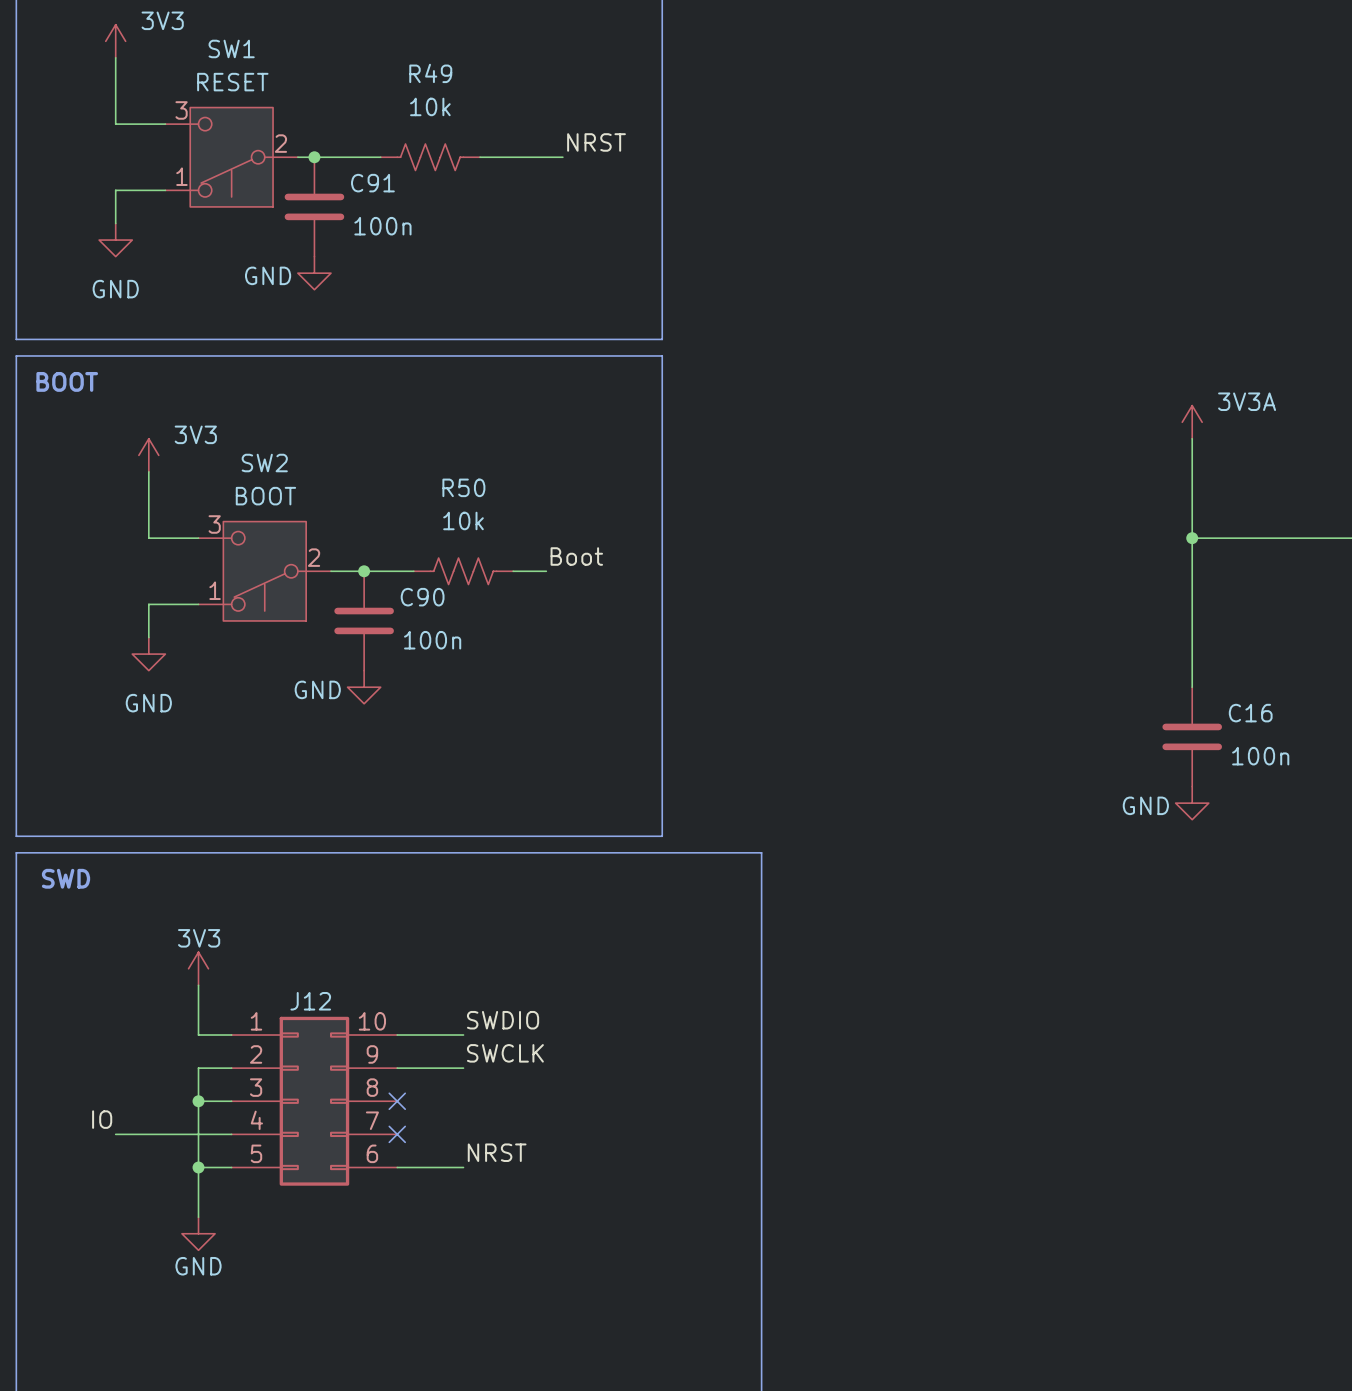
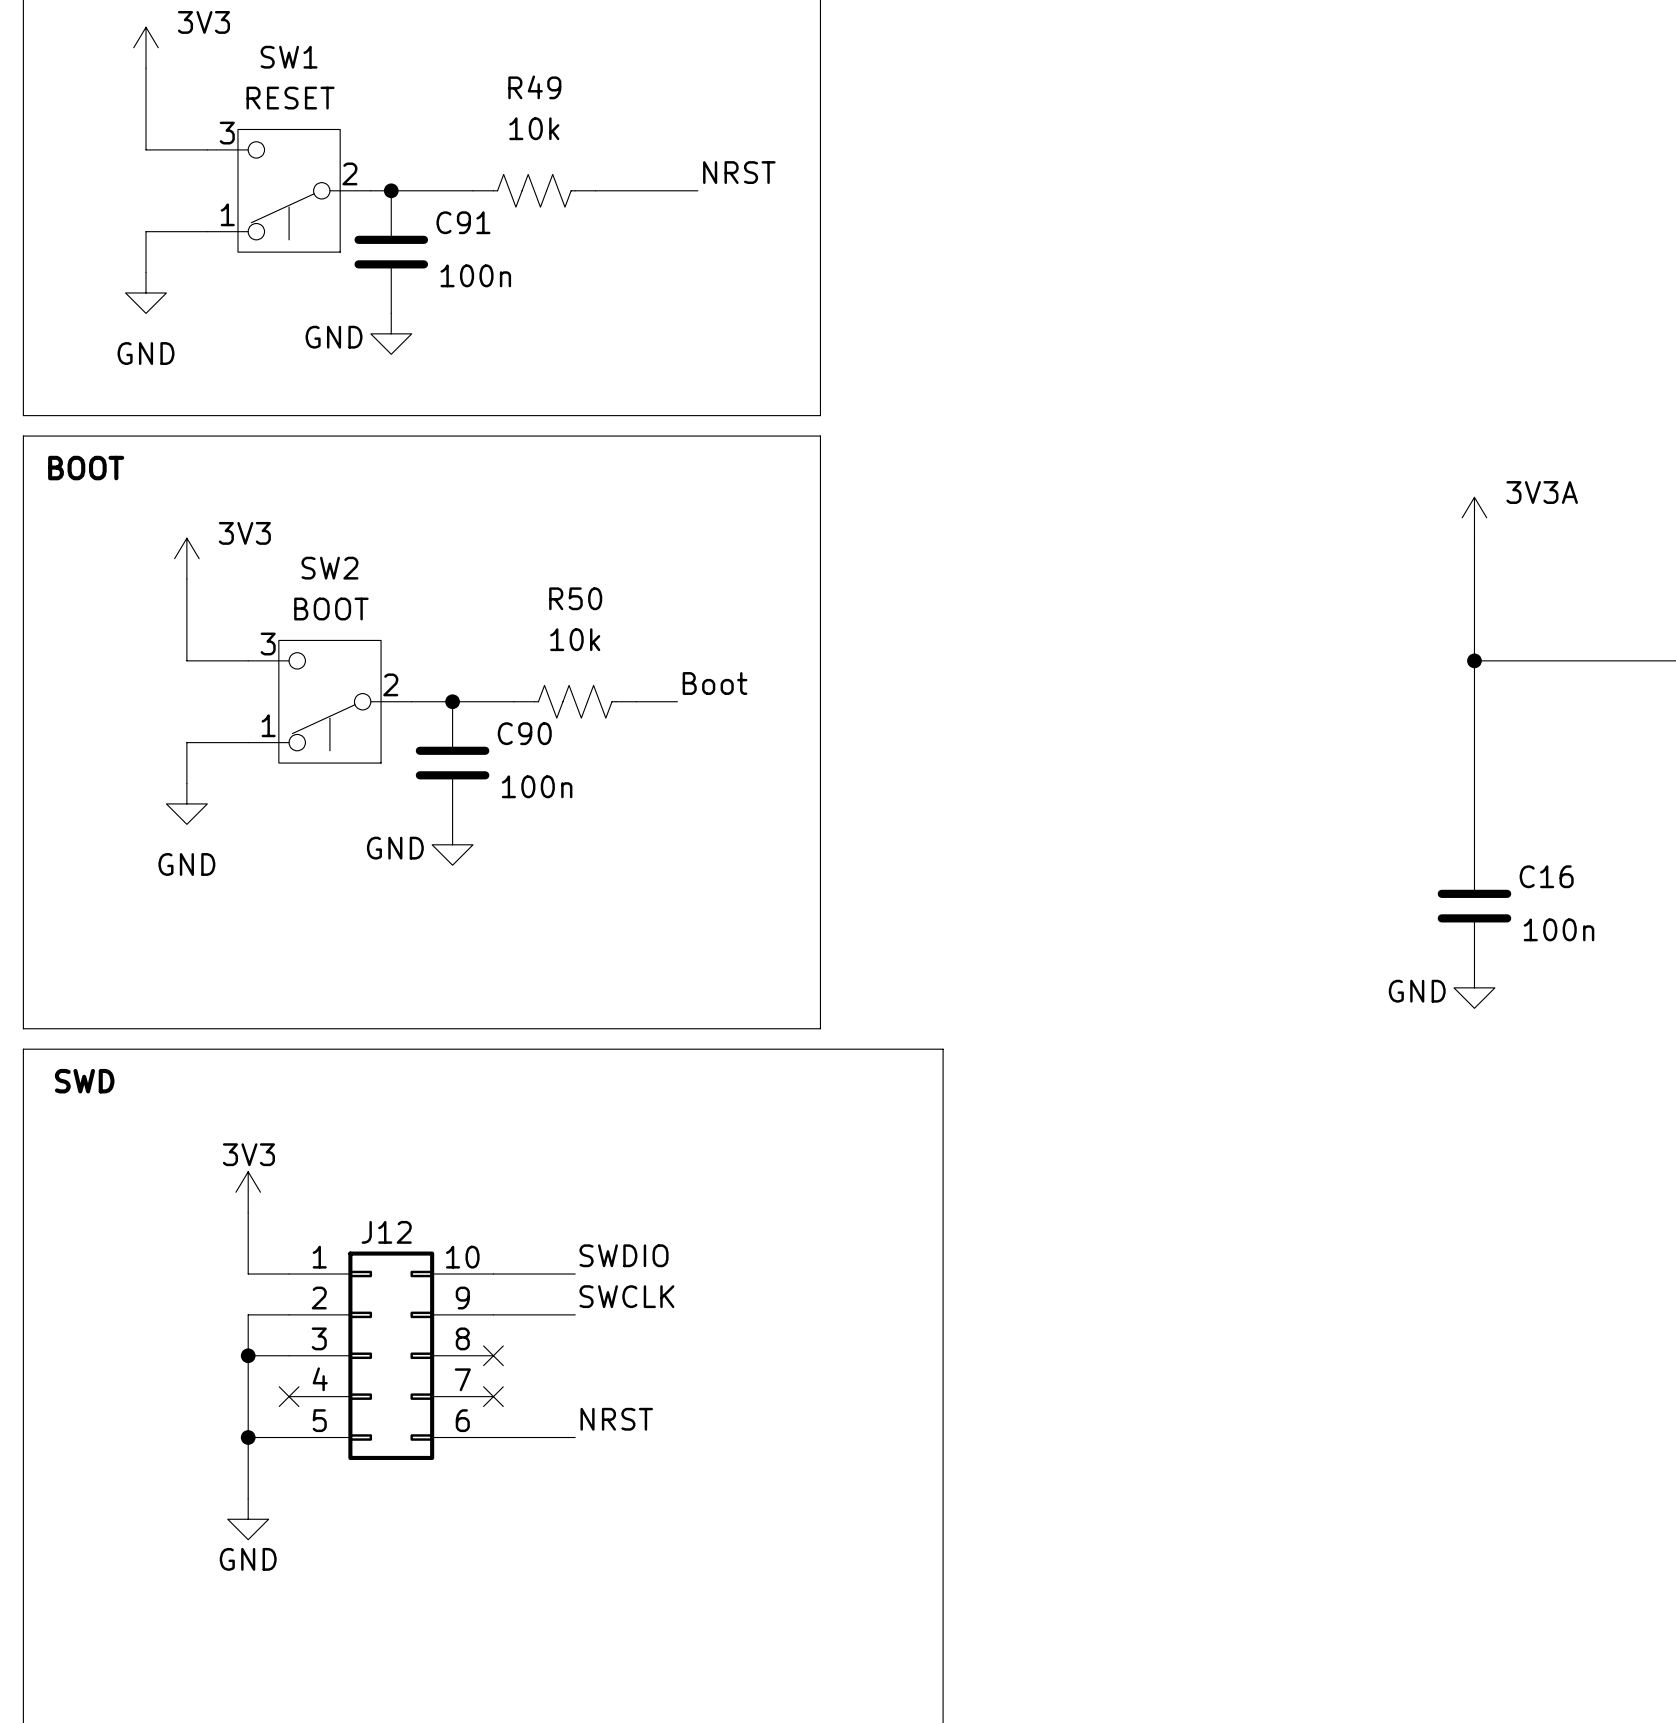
label: IO (102, 1119) -> none
wire: (115, 1134) (231, 1134) -> none
no-connect mark: none -> (289, 1396)

